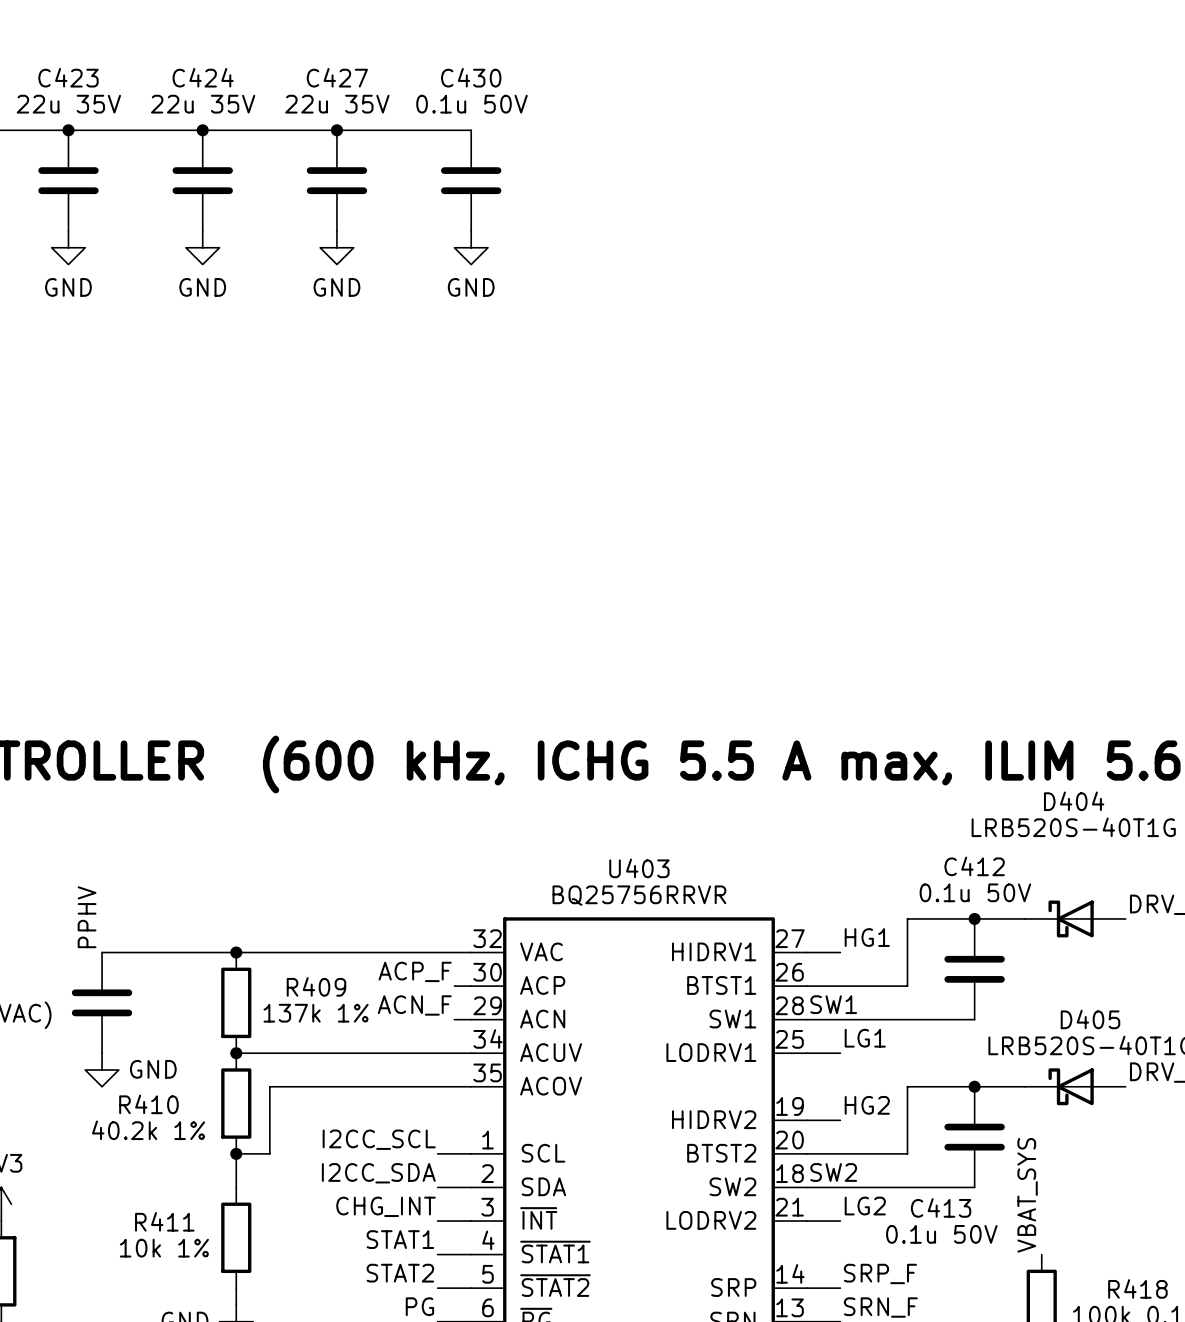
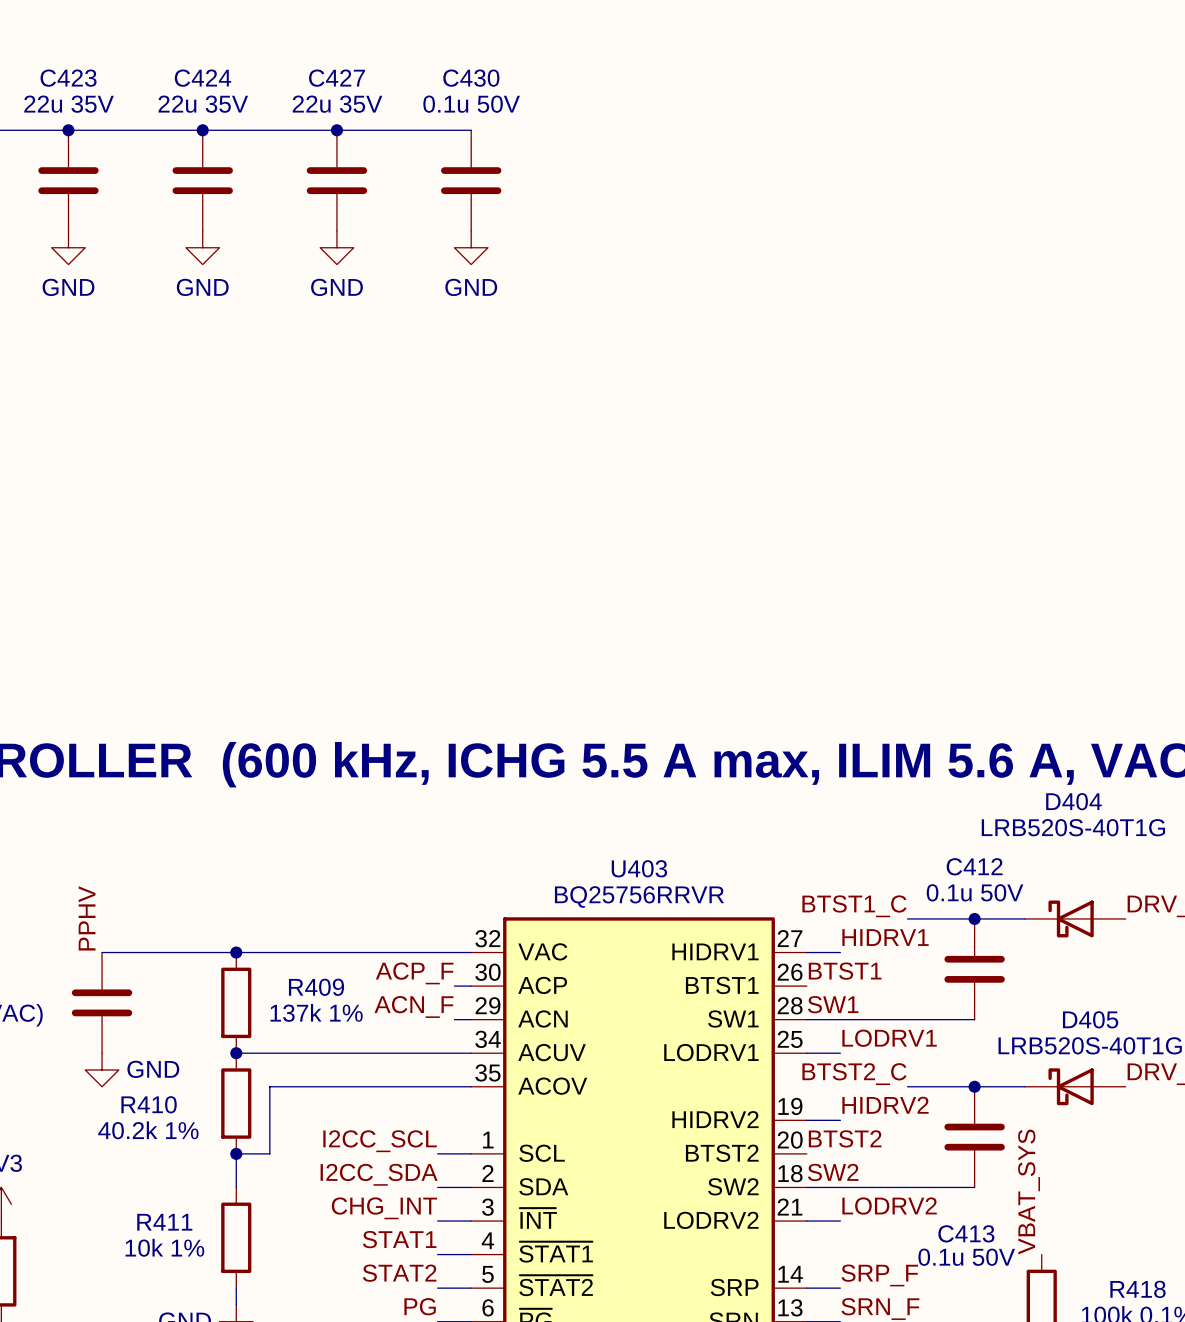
label: none -> BTST1_C (854, 906)
wire: (907, 918) (907, 986) (806, 986) -> none
label: HG1 (867, 937) -> HIDRV1 (885, 937)
label: none -> BTST1 (845, 971)
label: LG1 (865, 1038) -> LODRV1 (889, 1038)
label: none -> BTST2_C (854, 1074)
wire: (907, 1086) (907, 1153) (806, 1153) -> none
label: HG2 (867, 1105) -> HIDRV2 (885, 1105)
label: none -> BTST2 (845, 1138)
label: LG2 (865, 1206) -> LODRV2 (889, 1206)
C413 name position: C413 (941, 1207) -> C413 (966, 1233)
C413 value position: 0.1u 50V (941, 1234) -> 0.1u 50V (966, 1257)

